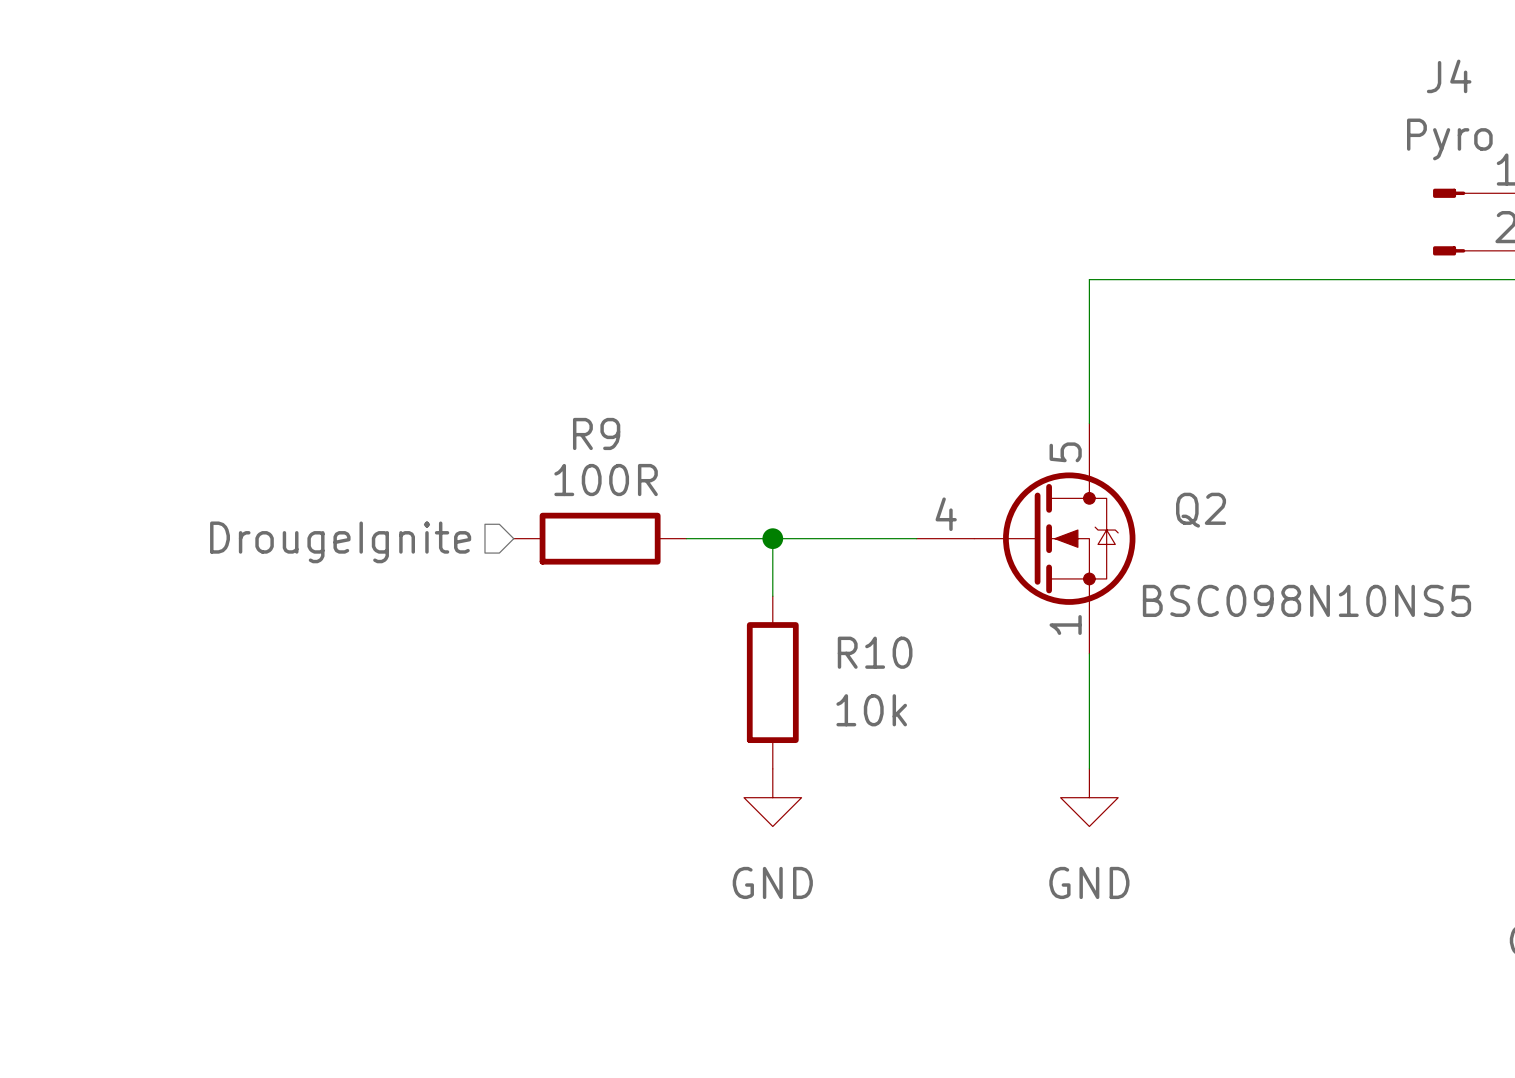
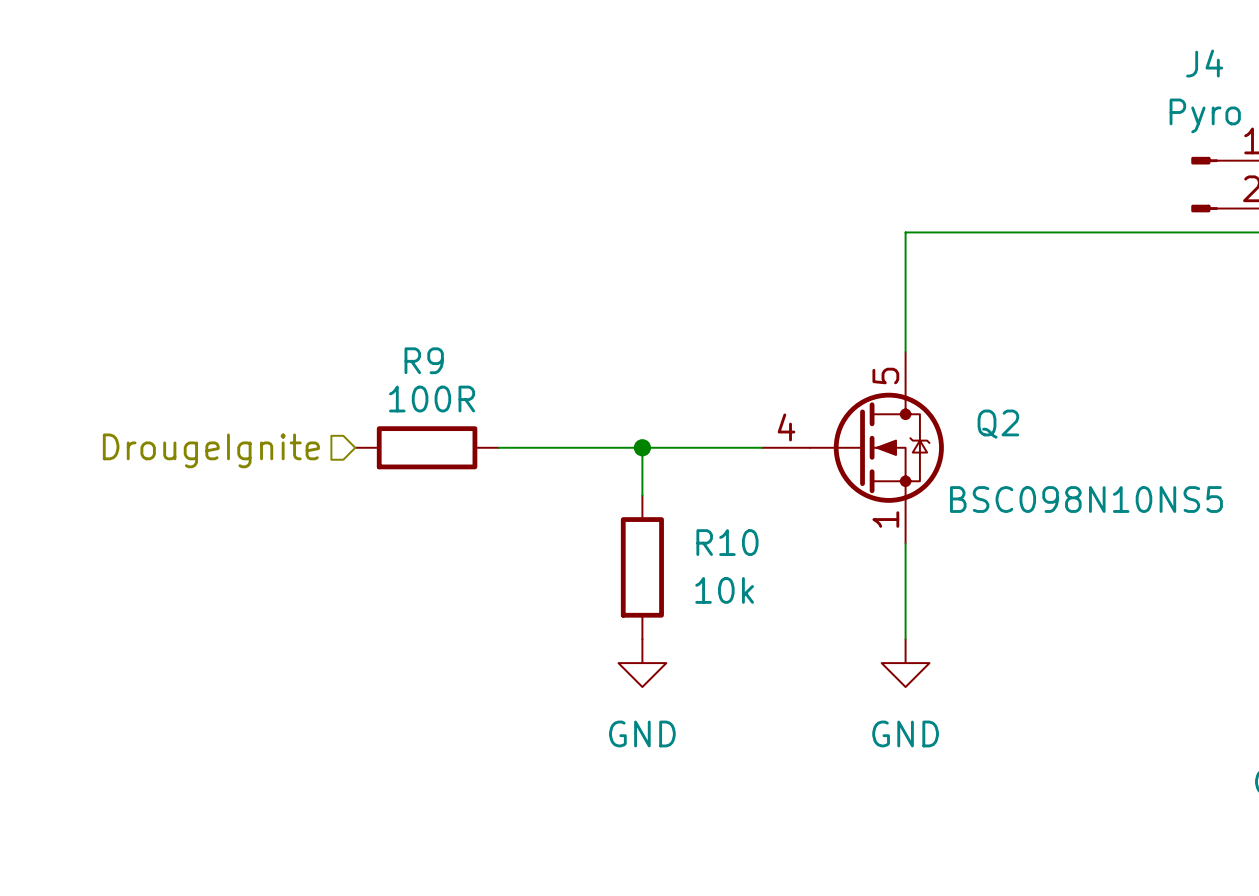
wire: none -> (498, 447) (570, 447)
R9 position: (600, 538) -> (427, 447)
hierarchical label position: DrougeIgnite (340, 542) -> DrougeIgnite (211, 450)

